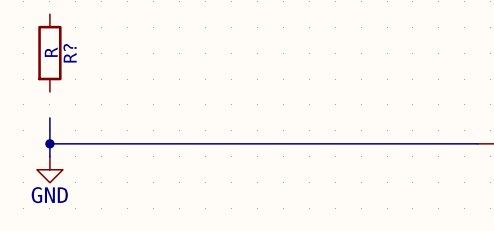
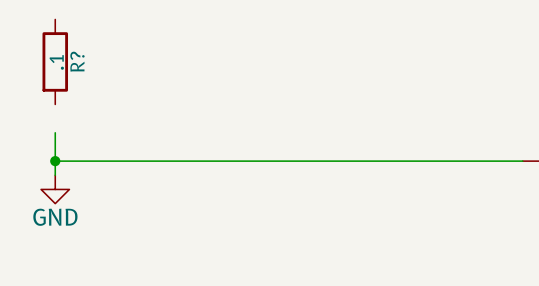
R? value: R (51, 52) -> .1 (56, 62)

